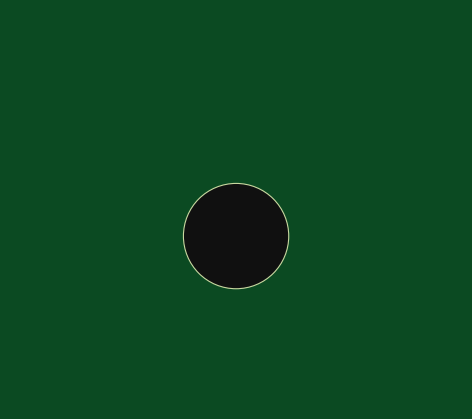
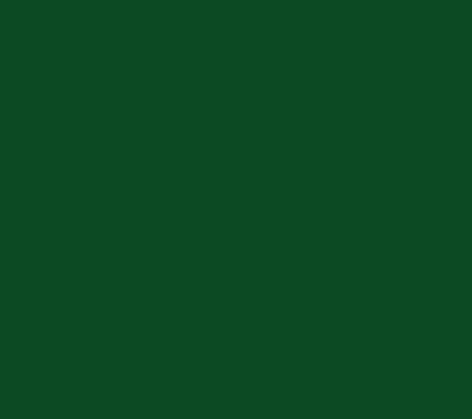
part: (236, 236) -> none

